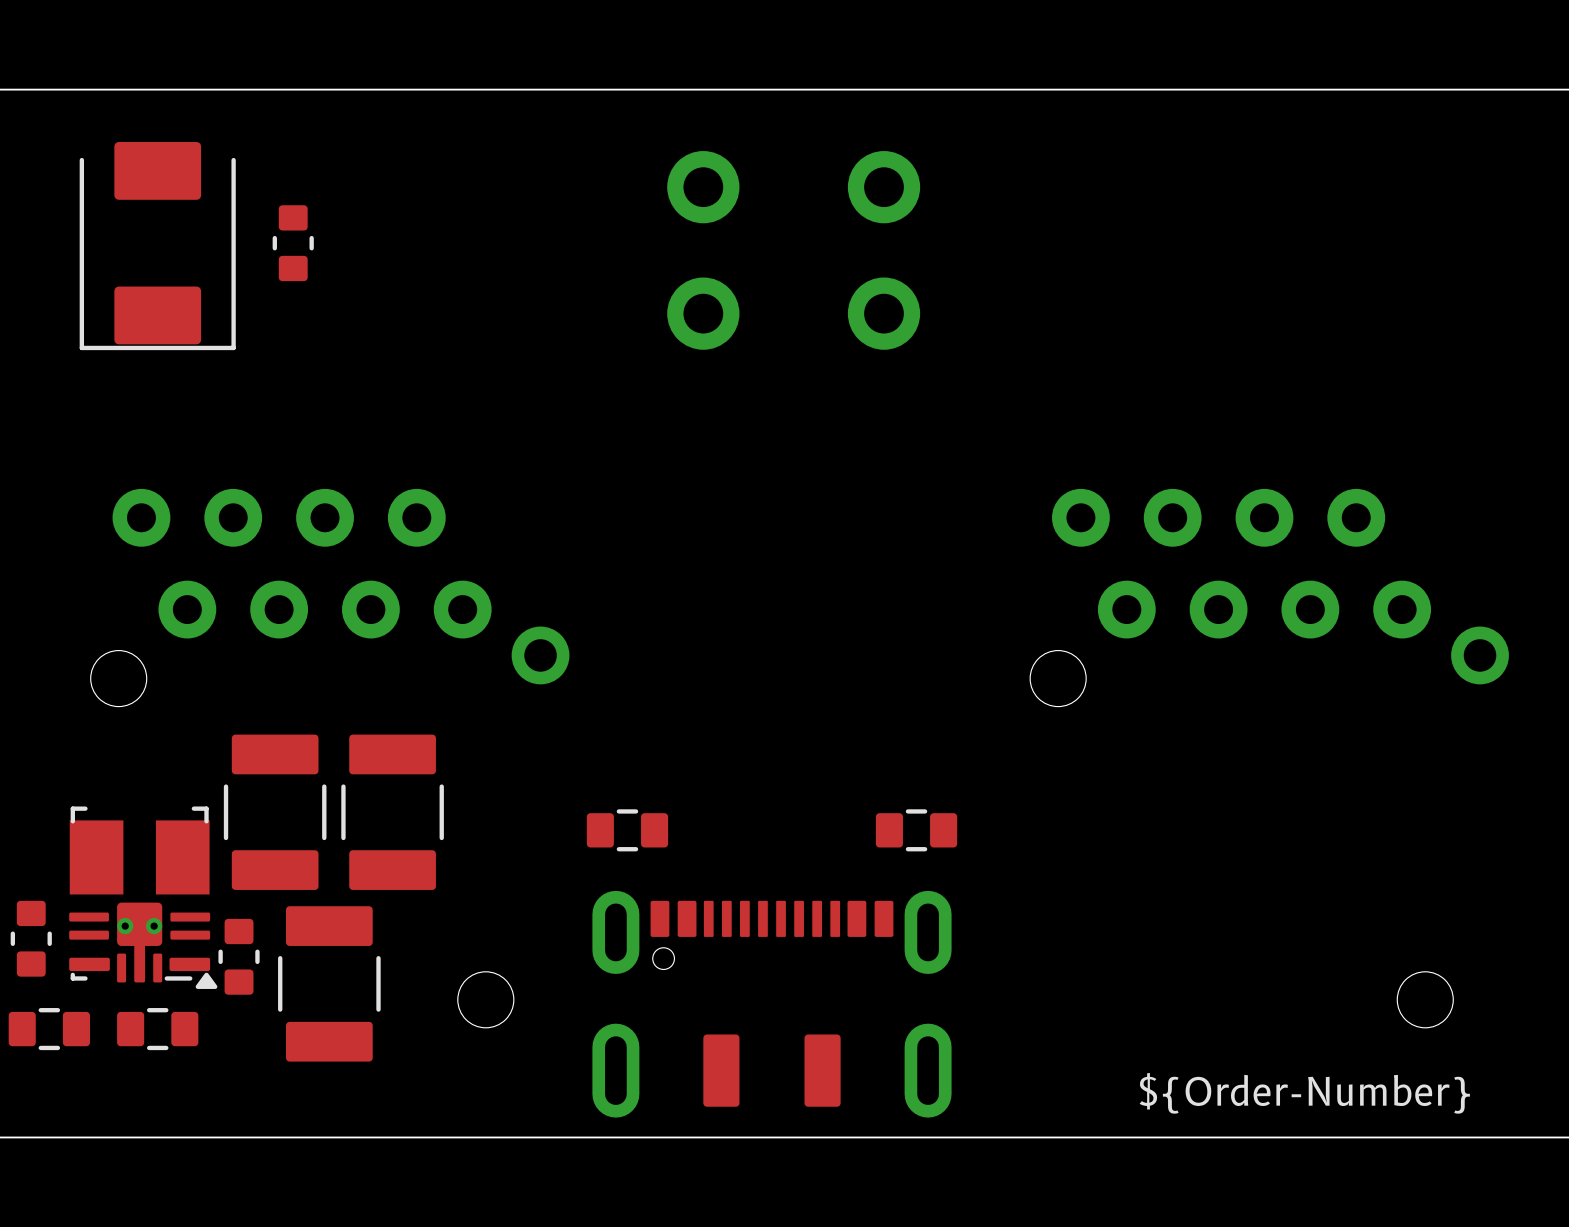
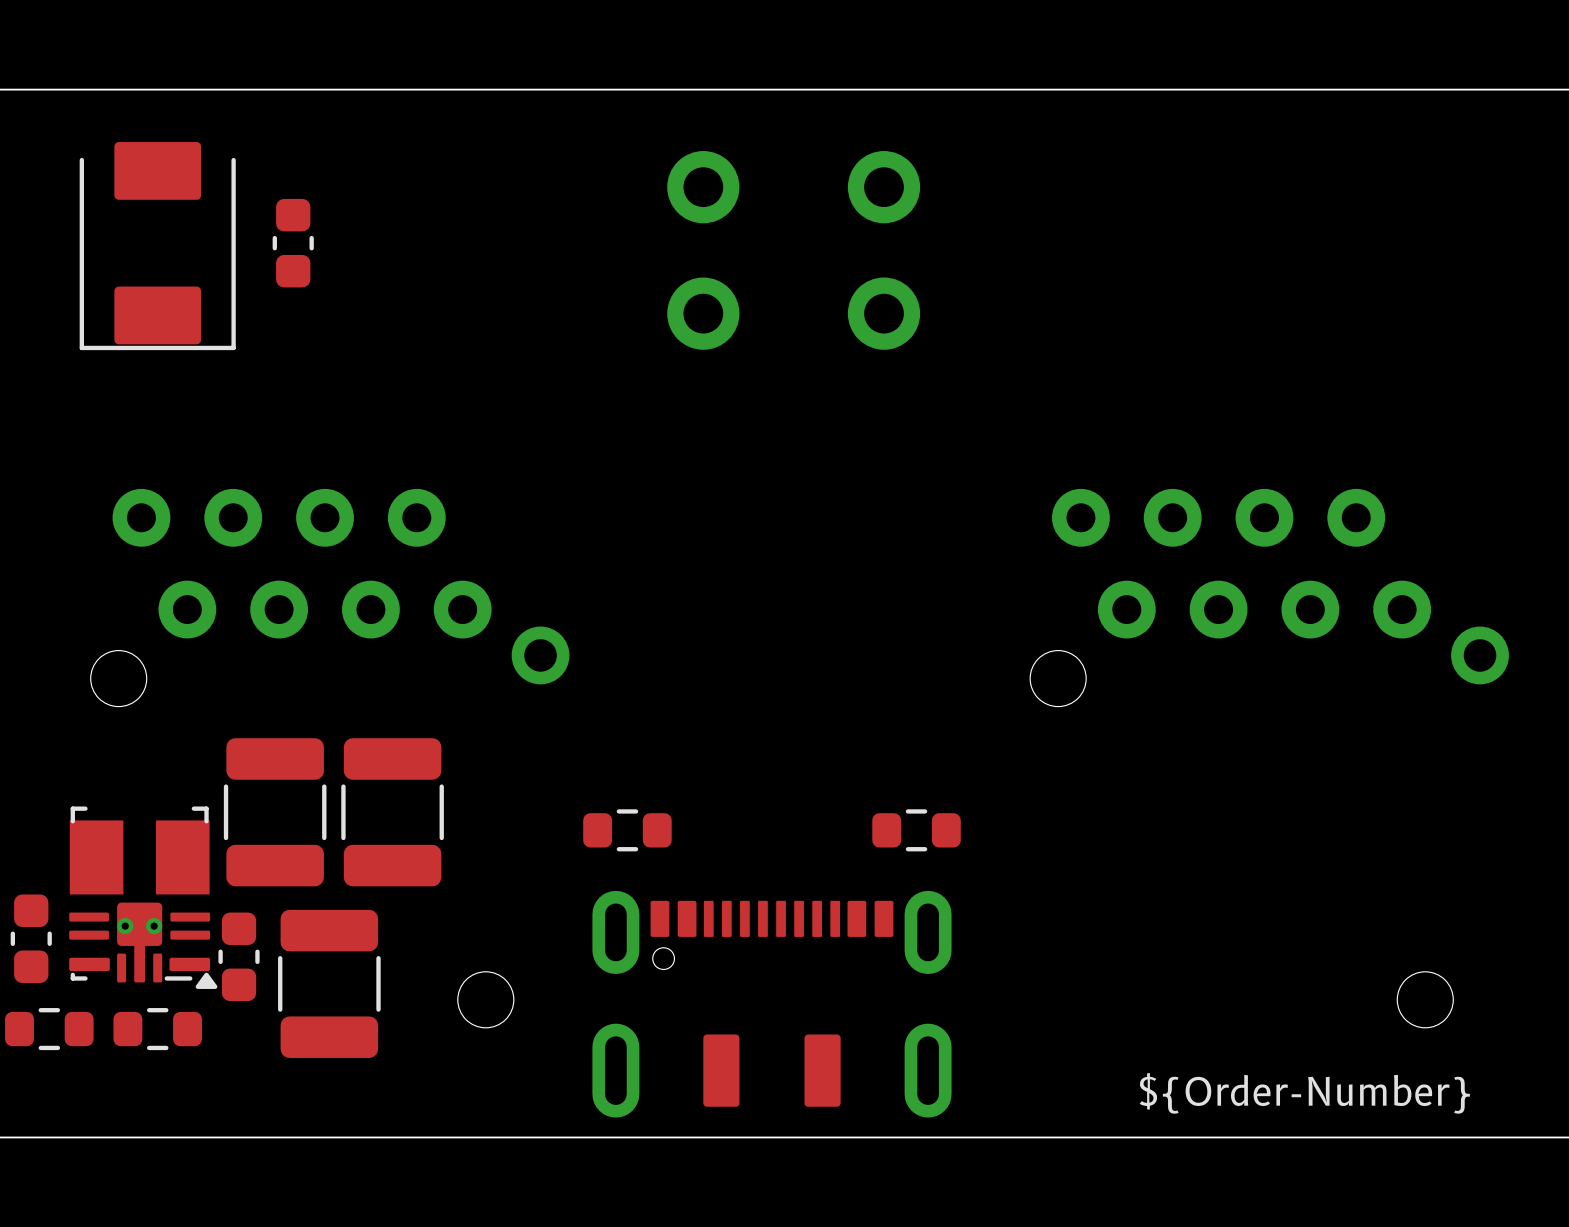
part footprint: [272, 205, 314, 282] -> [272, 198, 314, 288]
part footprint: [223, 734, 327, 890] -> [223, 738, 327, 887]
part footprint: [341, 734, 444, 890] -> [341, 738, 444, 887]
part footprint: [586, 809, 669, 852] -> [583, 809, 672, 852]
part footprint: [875, 809, 958, 852] -> [872, 809, 961, 852]
part footprint: [10, 900, 52, 977] -> [10, 894, 52, 984]
part footprint: [278, 906, 381, 1062] -> [278, 909, 381, 1058]
part footprint: [218, 918, 260, 995] -> [218, 912, 260, 1002]
part footprint: [8, 1008, 90, 1051] -> [5, 1008, 94, 1051]
part footprint: [117, 1008, 199, 1051] -> [113, 1008, 202, 1051]

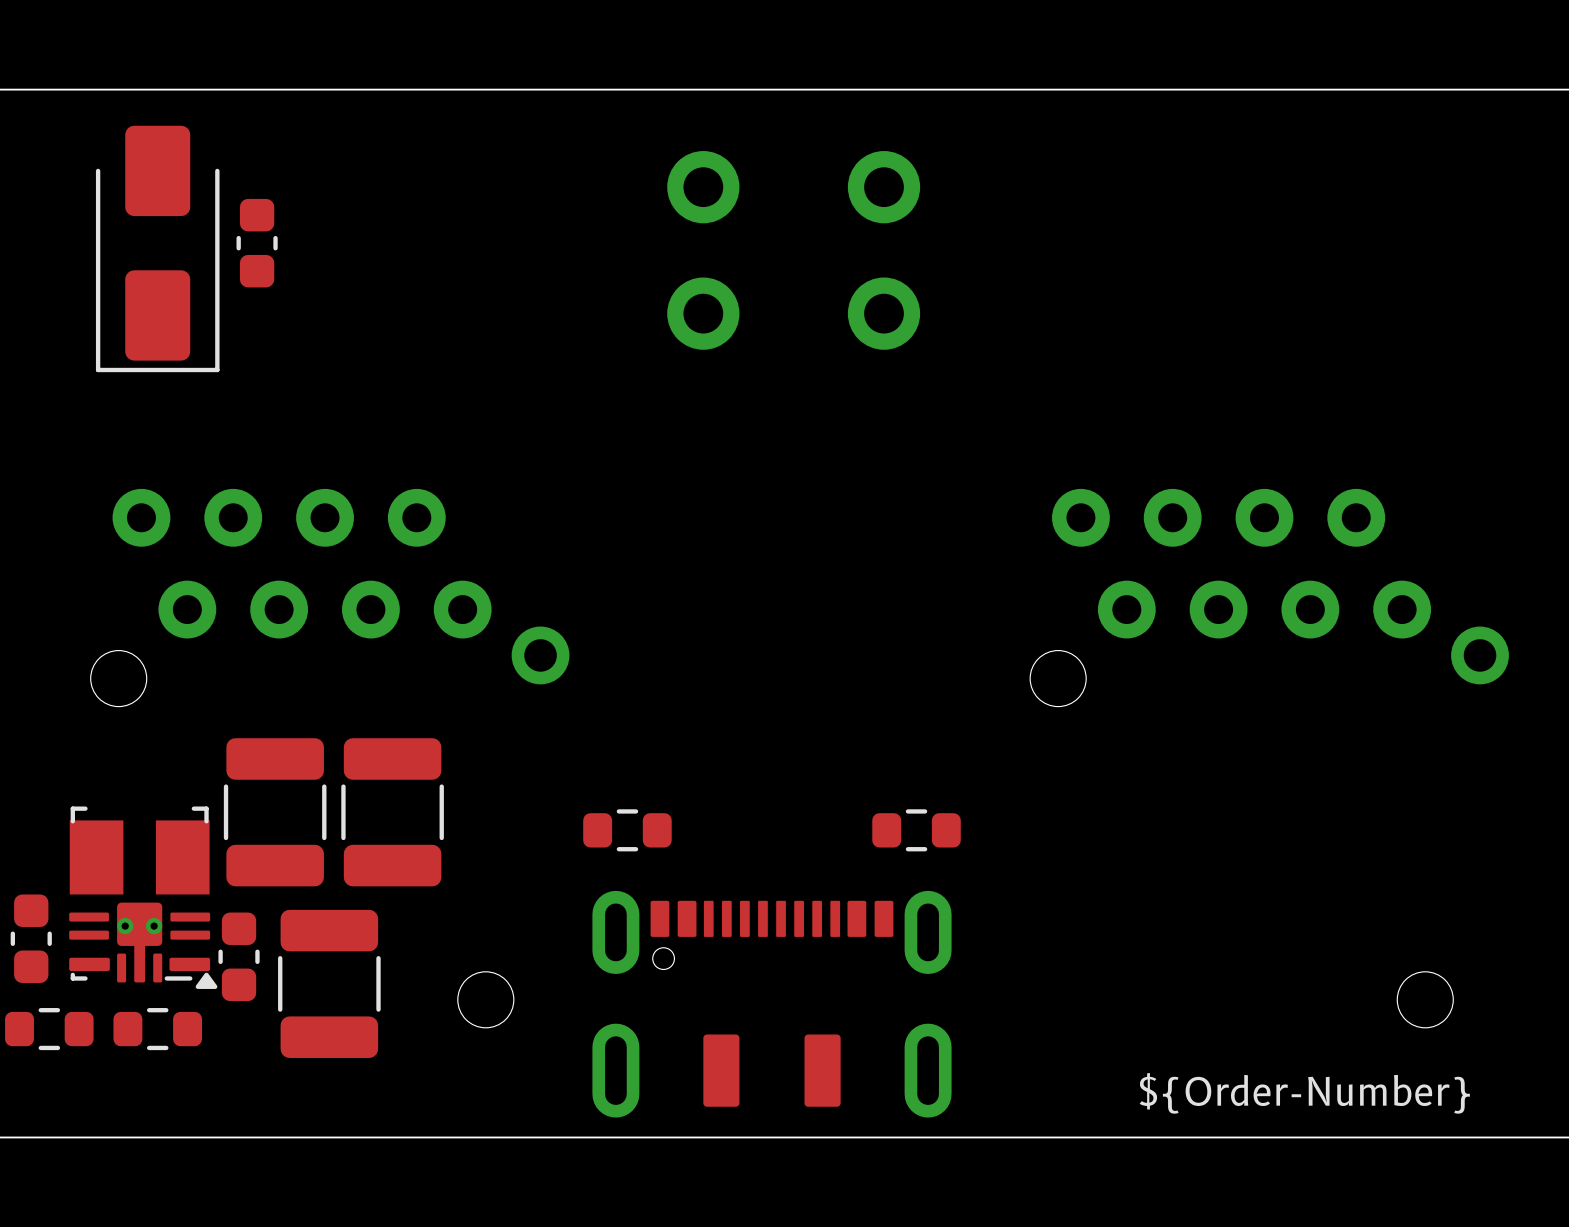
part footprint: [79, 142, 236, 351] -> [95, 125, 220, 373]
part position: (293, 243) -> (257, 243)

